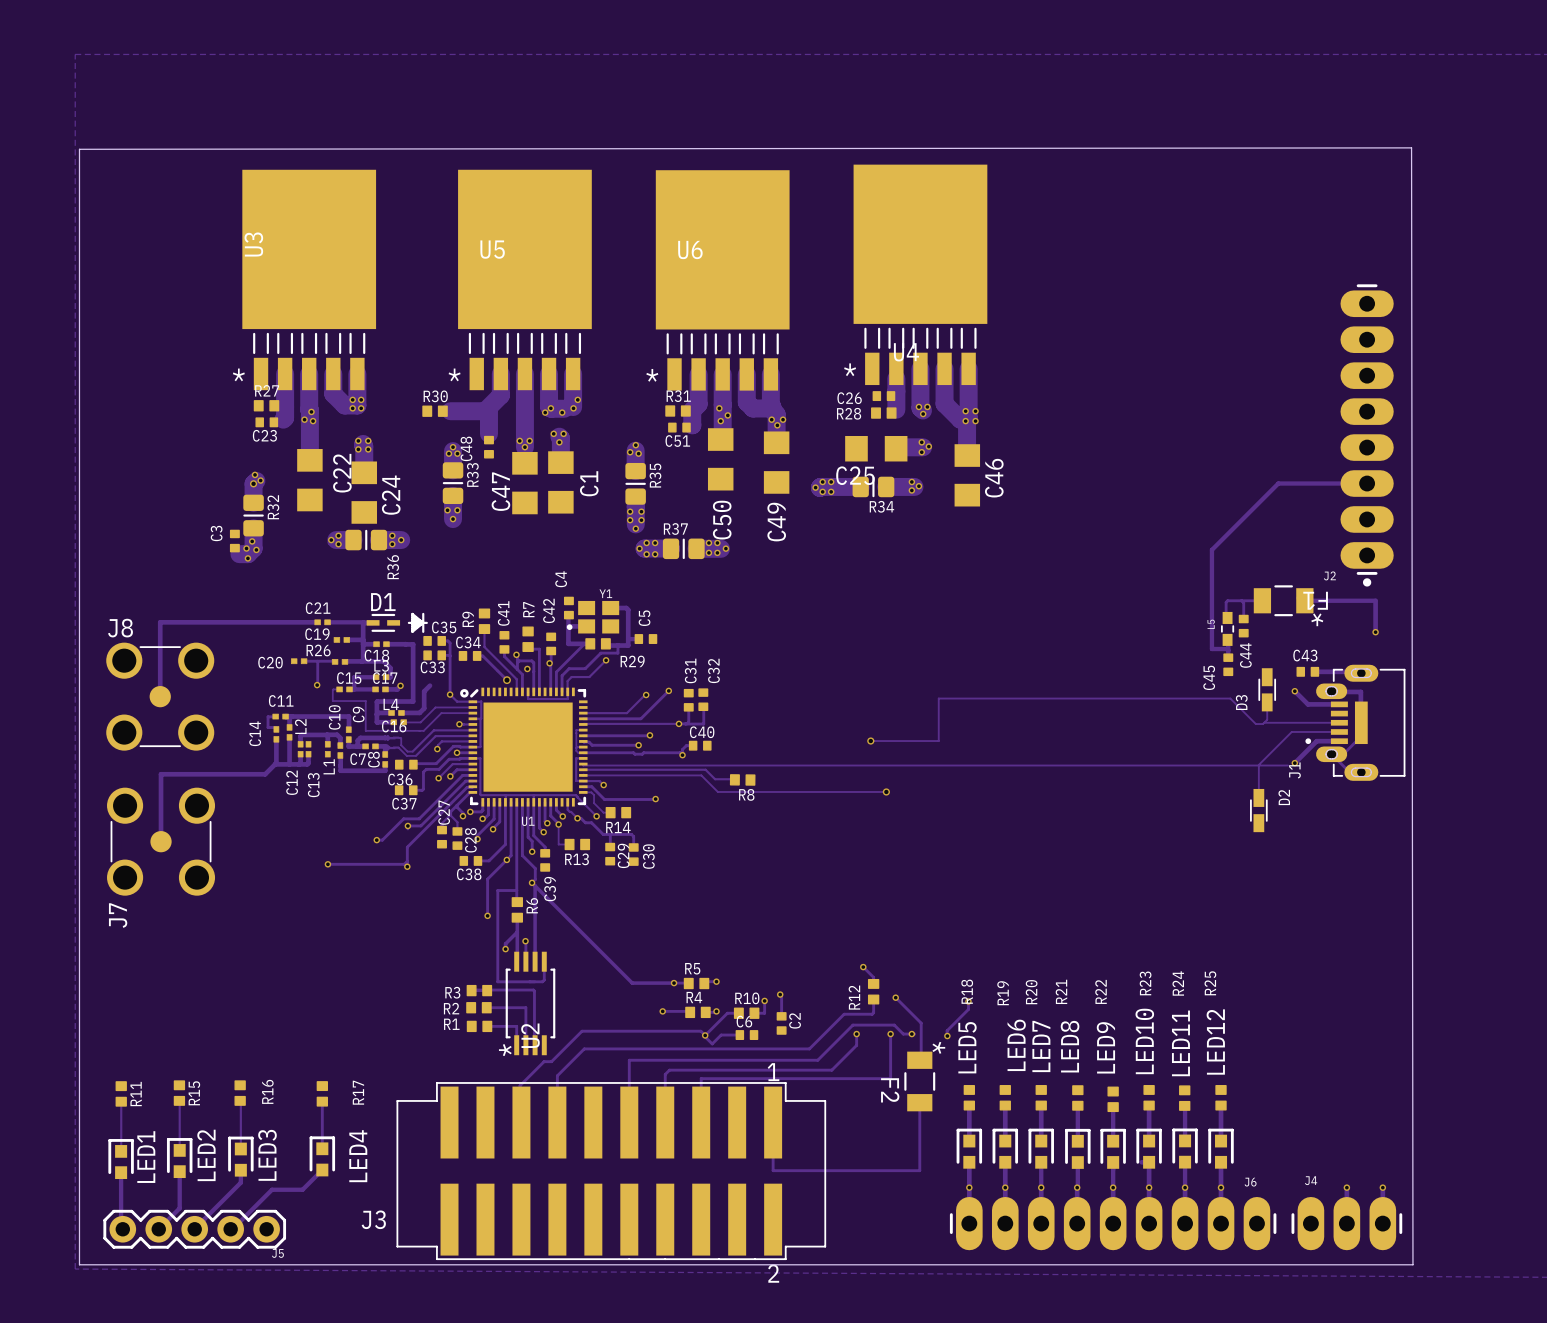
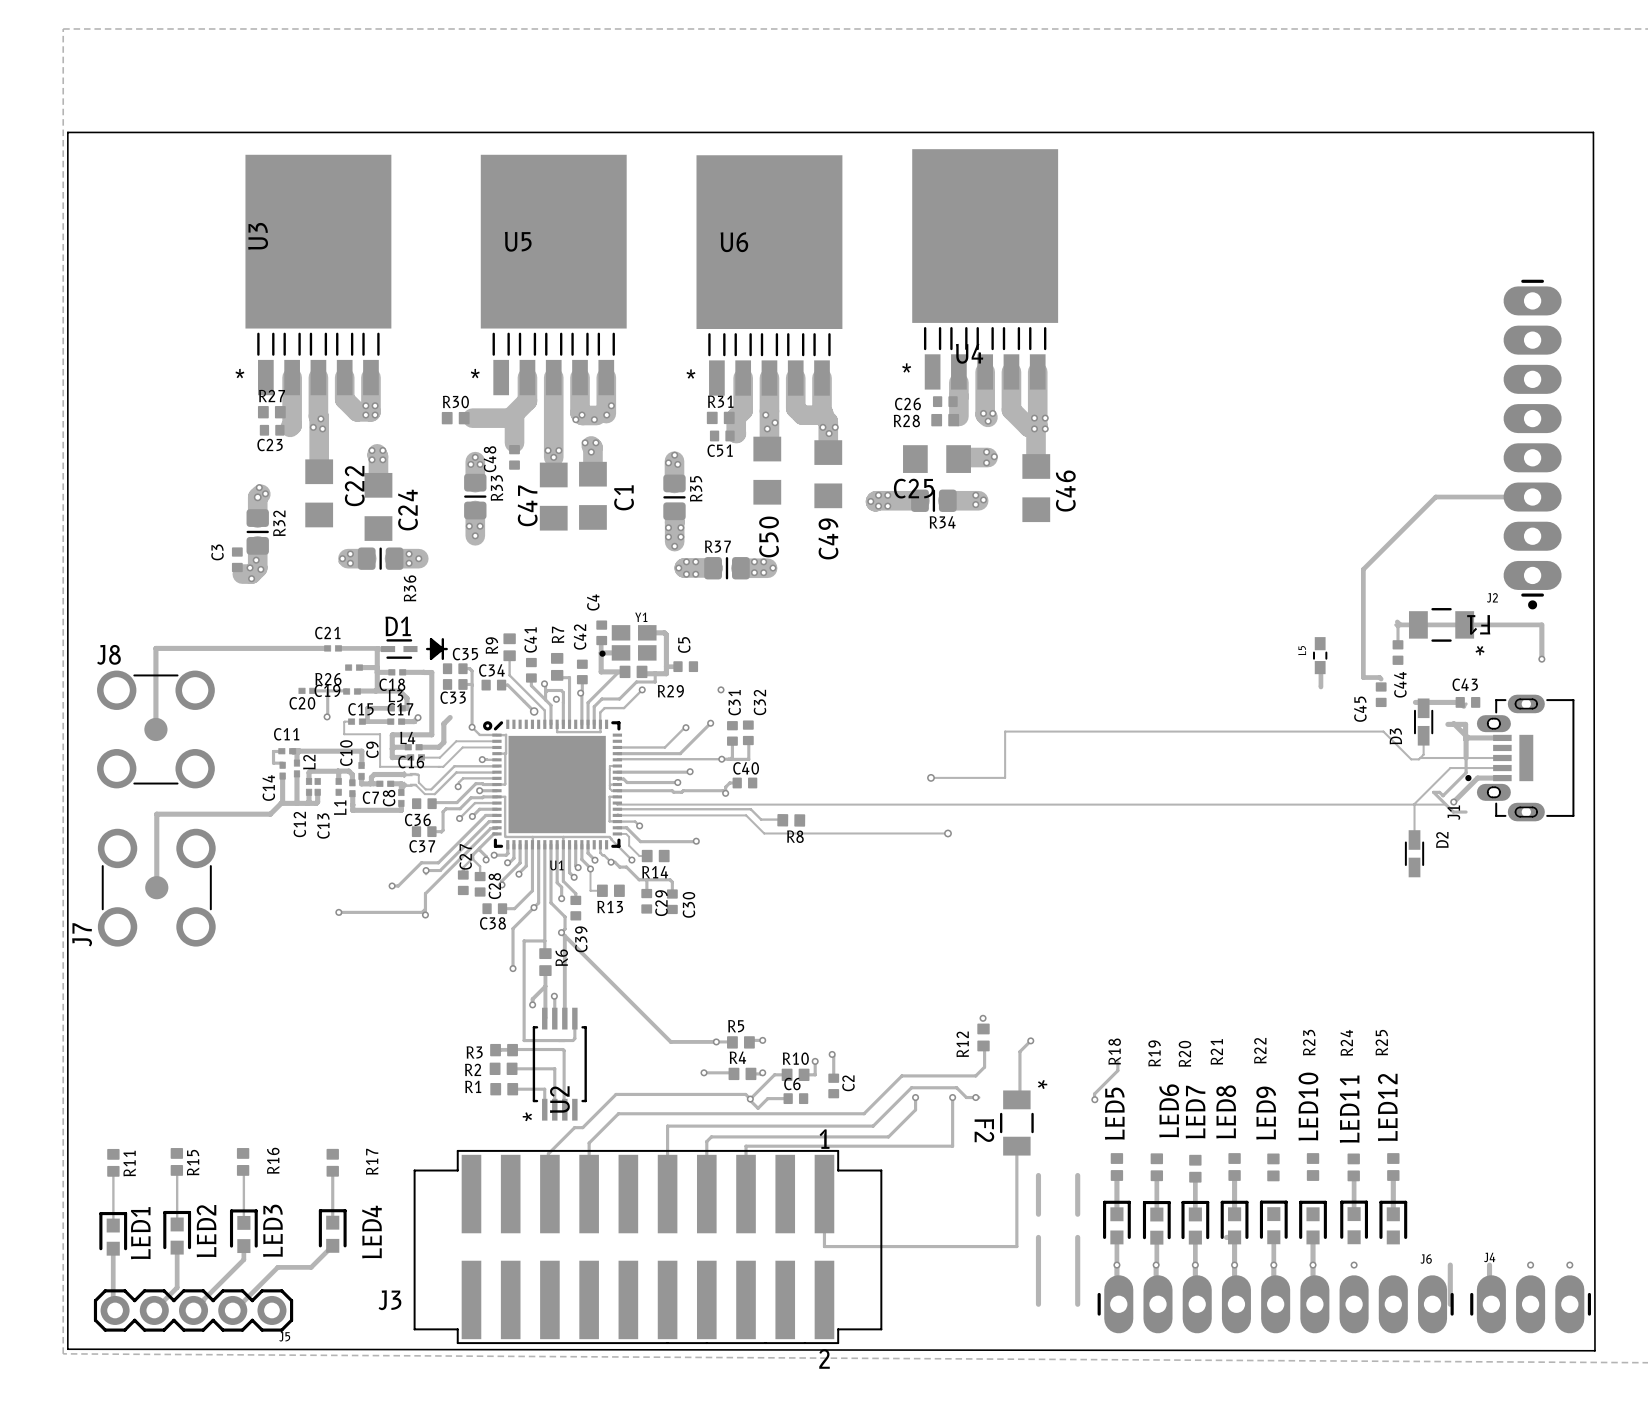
board edge: (79, 149) (1411, 147) (1412, 1264) (79, 1264) -> (67, 132) (1593, 132) (1594, 1350) (67, 1349)
J2 position: (1367, 435) -> (1532, 444)
track: (1333, 483) (1278, 483) (1211, 549) (1211, 649) (1228, 650) -> (1435, 497) (1363, 569) (1363, 677) (1381, 679)
track: none -> (1472, 497) (1532, 497)
track: (1241, 600) (1243, 602) (1243, 619) -> (1395, 624) (1398, 627) (1398, 644)
track: (1262, 600) (1227, 600) (1226, 602) (1227, 617) -> none
F1 position: (1283, 600) -> (1441, 624)
track: (1375, 600) (1375, 632) -> (1481, 624) (1541, 624) (1541, 659)
C44 position: (1243, 626) -> (1398, 652)
via position: (1375, 632) -> (1541, 659)
C19 name position: C19 (317, 634) -> C19 (327, 690)
via: none -> (721, 689)
C20 name position: C20 (270, 662) -> C20 (302, 703)
C45 position: (1228, 664) -> (1381, 694)
C43 position: (1307, 671) -> (1467, 702)
D3 position: (1267, 689) -> (1423, 722)
track: (1294, 691) (1307, 704) (1339, 704) -> (1453, 723) (1468, 737) (1502, 737)
via: (1294, 691) -> none
track: (1230, 698) (1255, 724) (1262, 724) (1267, 719) (1267, 702) -> (1323, 731) (1383, 731) (1411, 759) (1418, 759) (1423, 754) (1423, 735)
track: (1264, 722) (1319, 722) -> (1386, 804) (1446, 804)
track: none -> (1442, 758) (1502, 758)
J1 position: (1355, 722) -> (1519, 758)
track: (1339, 731) (1291, 731) (1258, 764) (1258, 797) -> (1502, 768) (1450, 768) (1414, 803) (1414, 839)
C14 name position: C14 (255, 733) -> C14 (268, 788)
track: (1339, 741) (1316, 741) (1294, 763) -> (1502, 778) (1477, 778) (1453, 802)
via: (1294, 763) -> none
via: none -> (1453, 802)
D2 position: (1258, 810) -> (1414, 853)
J7 name position: J7 (118, 915) -> J7 (82, 934)
via: none -> (983, 1018)
track: (861, 965) (873, 977) (873, 983) -> none
via: (863, 967) -> none
track: none -> (1030, 1040) (1019, 1051) (1019, 1096) (1016, 1099)
R23 name: R23 (1145, 983) -> R21 (1216, 1051)
R24 name: R24 (1178, 983) -> R22 (1260, 1050)
R25 name: R25 (1210, 983) -> R23 (1309, 1042)
R12 position: (873, 991) -> (983, 1037)
R21 name: R21 (1061, 991) -> R19 (1154, 1053)
R22 name: R22 (1101, 991) -> R20 (1184, 1053)
R20 name: R20 (1031, 992) -> R18 (1114, 1051)
track: (895, 997) (921, 1023) (919, 1060) -> none
via: (895, 997) -> none
track: (873, 999) (872, 1014) -> (983, 1045) (984, 1067) (975, 1075) (932, 1075)
track: (968, 1001) (968, 1009) (947, 1030) (947, 1036) -> (1117, 1062) (1117, 1070) (1094, 1093) (1094, 1099)
via position: (968, 1001) -> (1030, 1040)
via: (947, 1036) -> none
via: none -> (1094, 1099)
LED10 name: LED10 (1144, 1041) -> LED8 (1226, 1111)
LED12 name: LED12 (1215, 1042) -> LED10 (1308, 1106)
LED11 name: LED11 (1180, 1043) -> LED9 (1266, 1113)
LED7 name: LED7 (1041, 1046) -> LED5 (1114, 1113)
LED8 name: LED8 (1070, 1046) -> LED6 (1169, 1110)
LED9 name: LED9 (1105, 1047) -> LED7 (1195, 1112)
F2 position: (919, 1081) -> (1016, 1123)
R18: (969, 1097) -> none
R19: (1005, 1097) -> none
R25: none -> (1393, 1167)
R24: none -> (1353, 1167)
track: (919, 1102) (919, 1170) -> (1016, 1146) (1016, 1246) (984, 1246)
track: (1184, 1105) (1184, 1140) -> (1353, 1175) (1353, 1213)
track: (1221, 1105) (1221, 1141) -> (1393, 1175) (1393, 1214)
LED5: (969, 1148) -> none
LED6: (1005, 1148) -> none
LED11: none -> (1354, 1222)
LED12: none -> (1393, 1222)
via: (969, 1187) -> none
via: (1005, 1187) -> none
via: none -> (1354, 1265)
via: (1346, 1187) -> none
via: (1382, 1187) -> none
via: none -> (1530, 1265)
via: none -> (1569, 1265)
J6 position: (1113, 1223) -> (1275, 1304)
J4 position: (1346, 1223) -> (1530, 1304)

